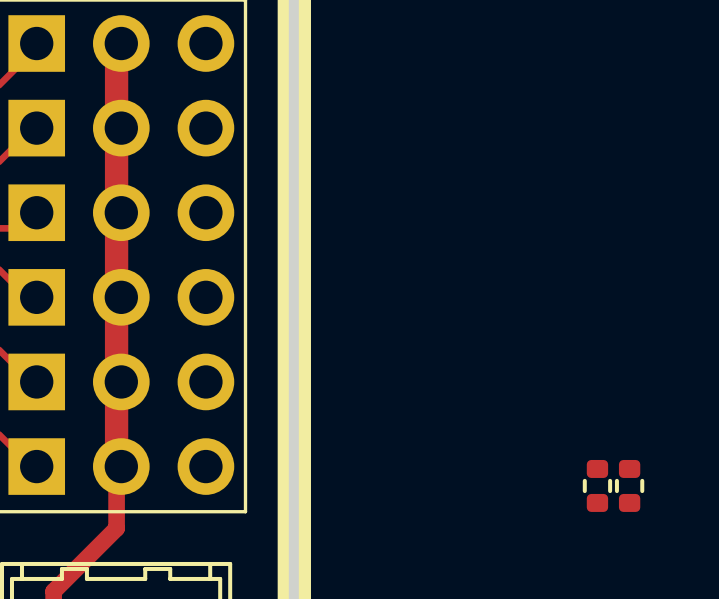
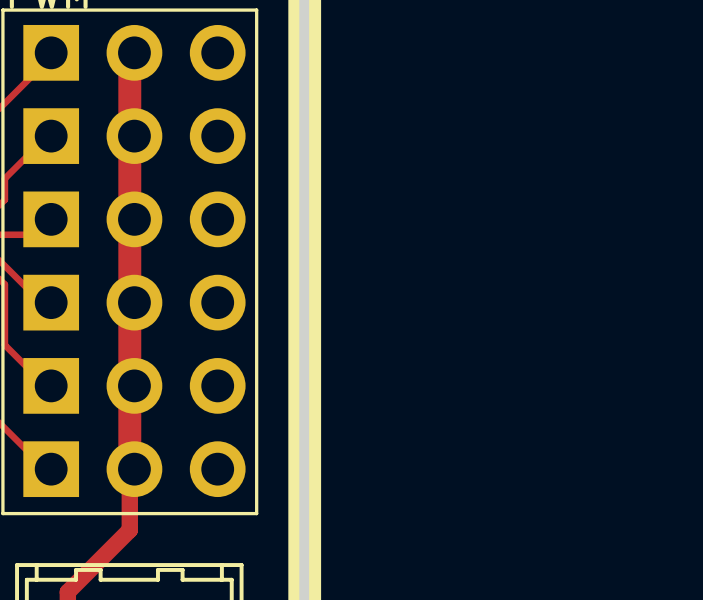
part: (597, 485) -> none
part: (629, 485) -> none

